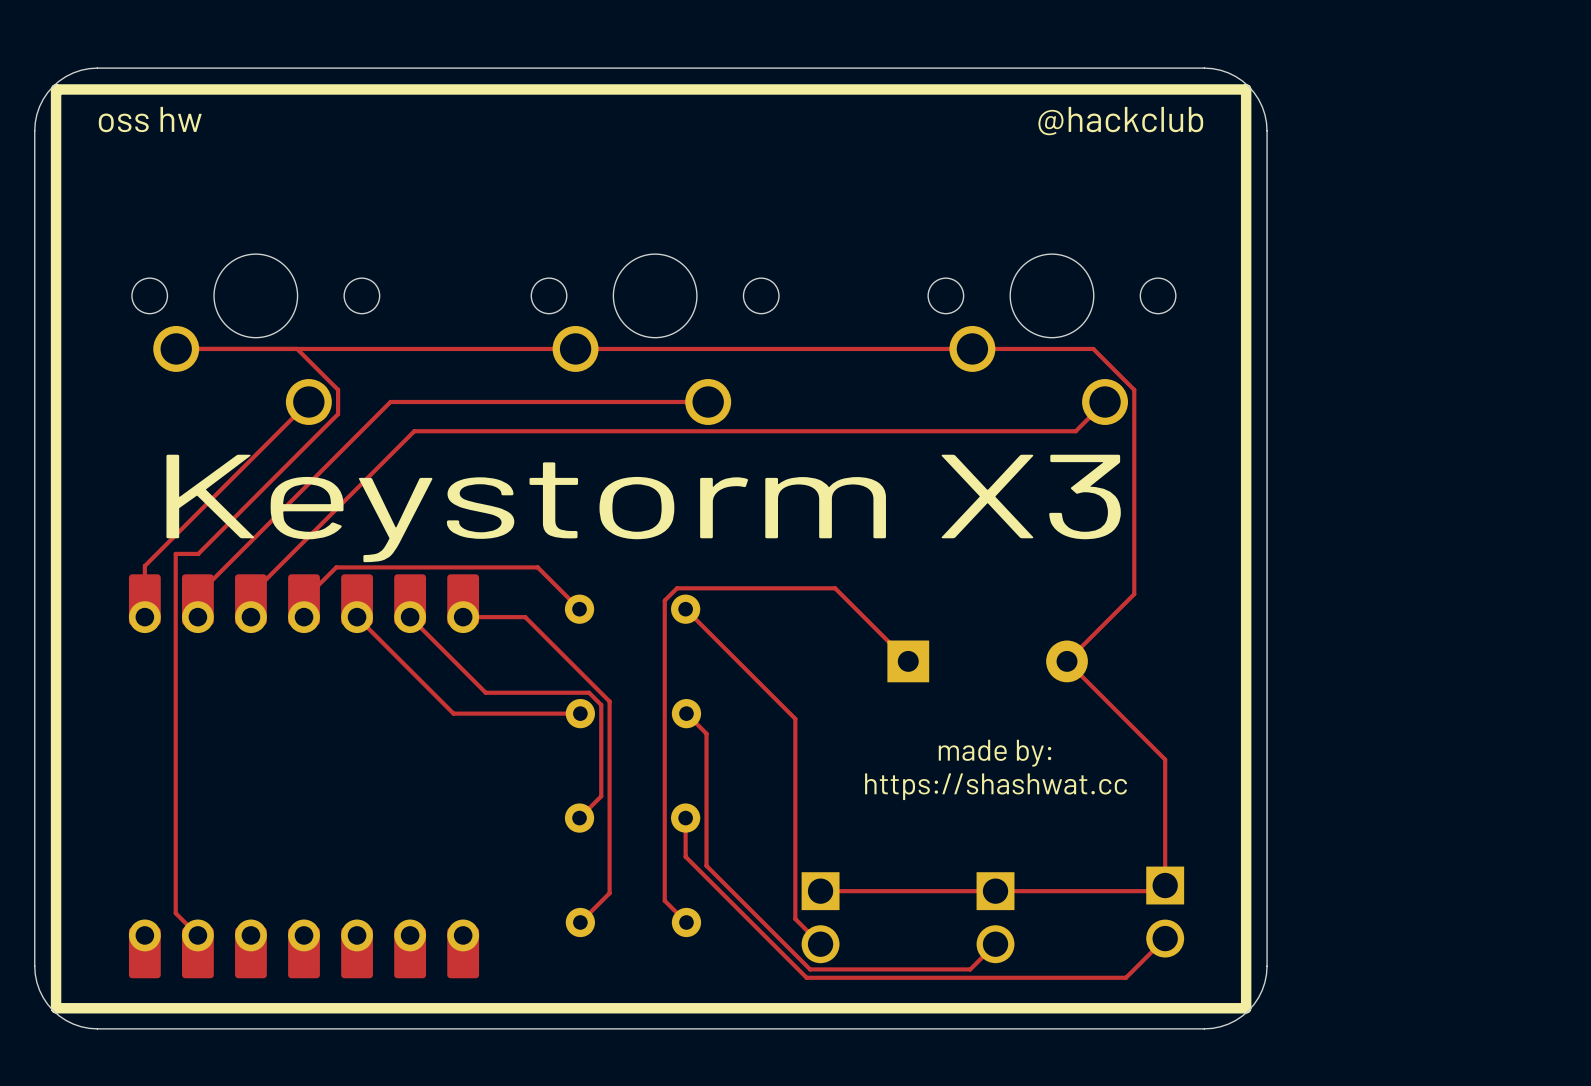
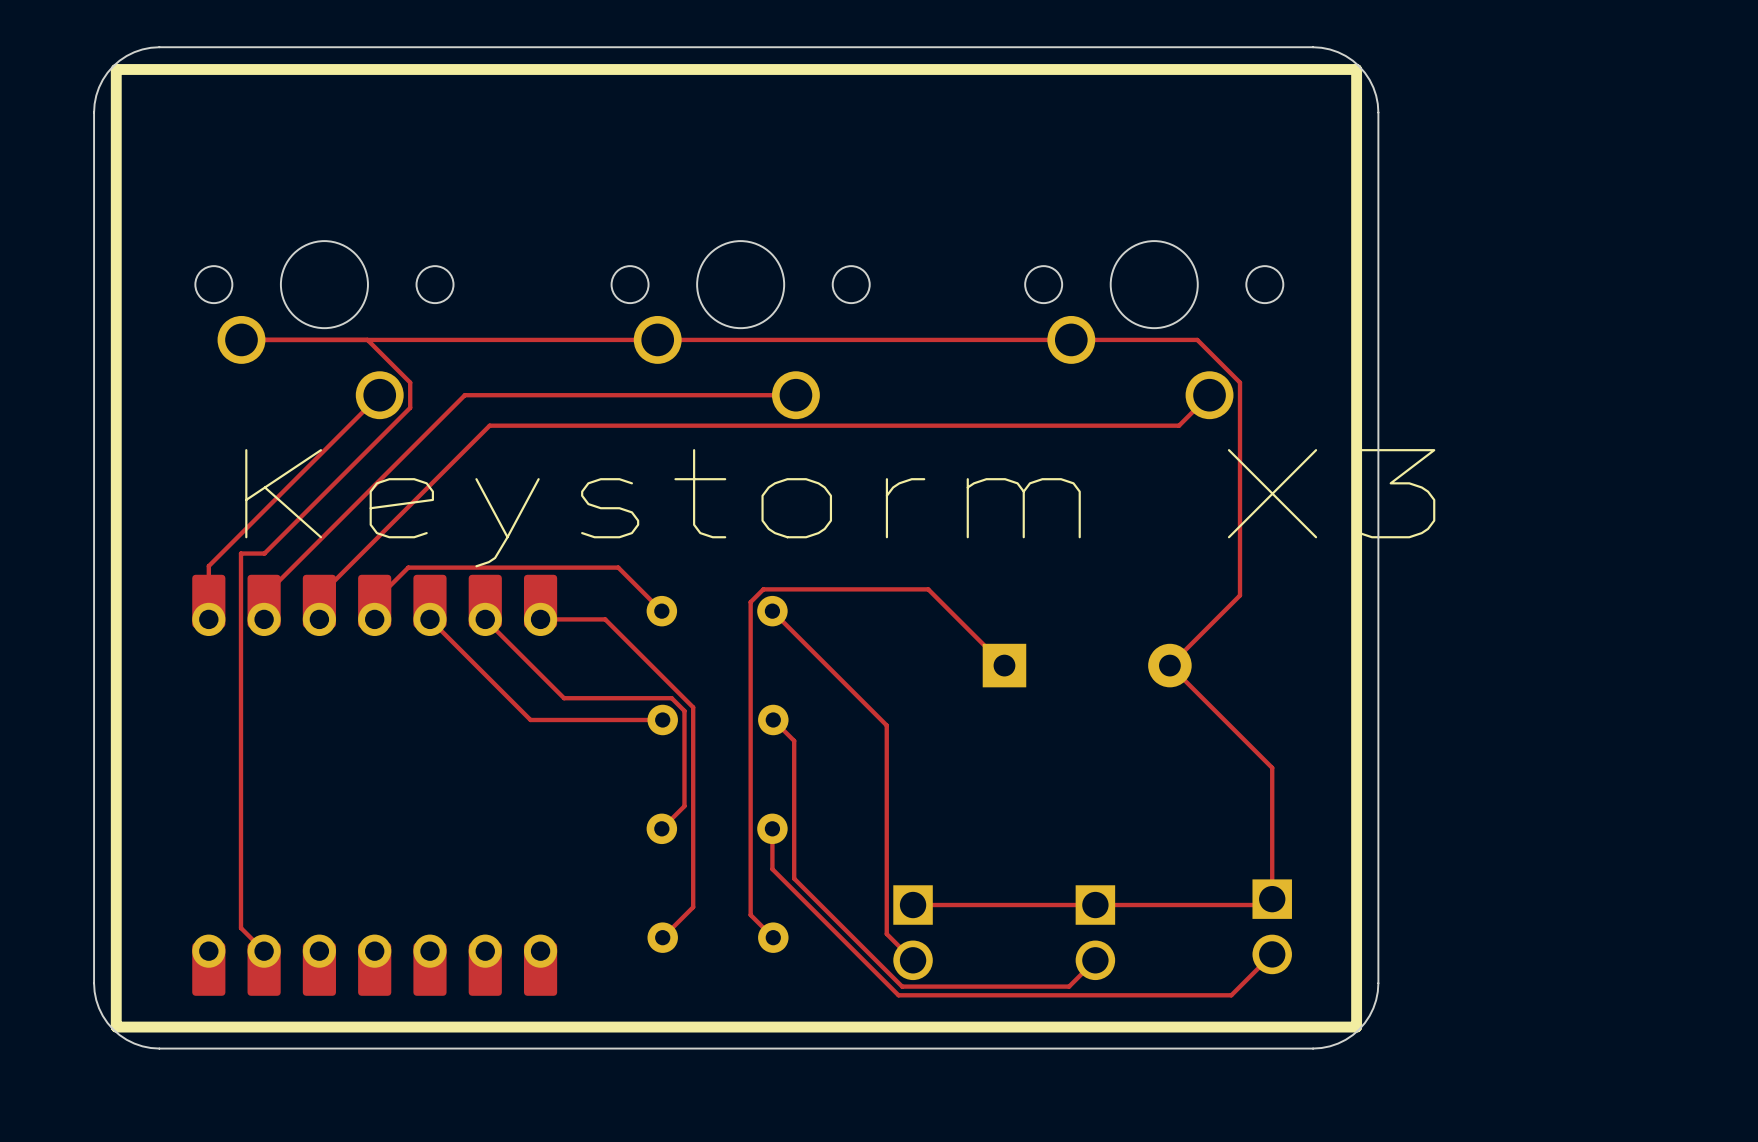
text: oss hw (150, 119) -> none
text: @hackclub (1120, 121) -> none
text: made by: (995, 753) -> none
text: https://shashwat.cc (996, 786) -> none

